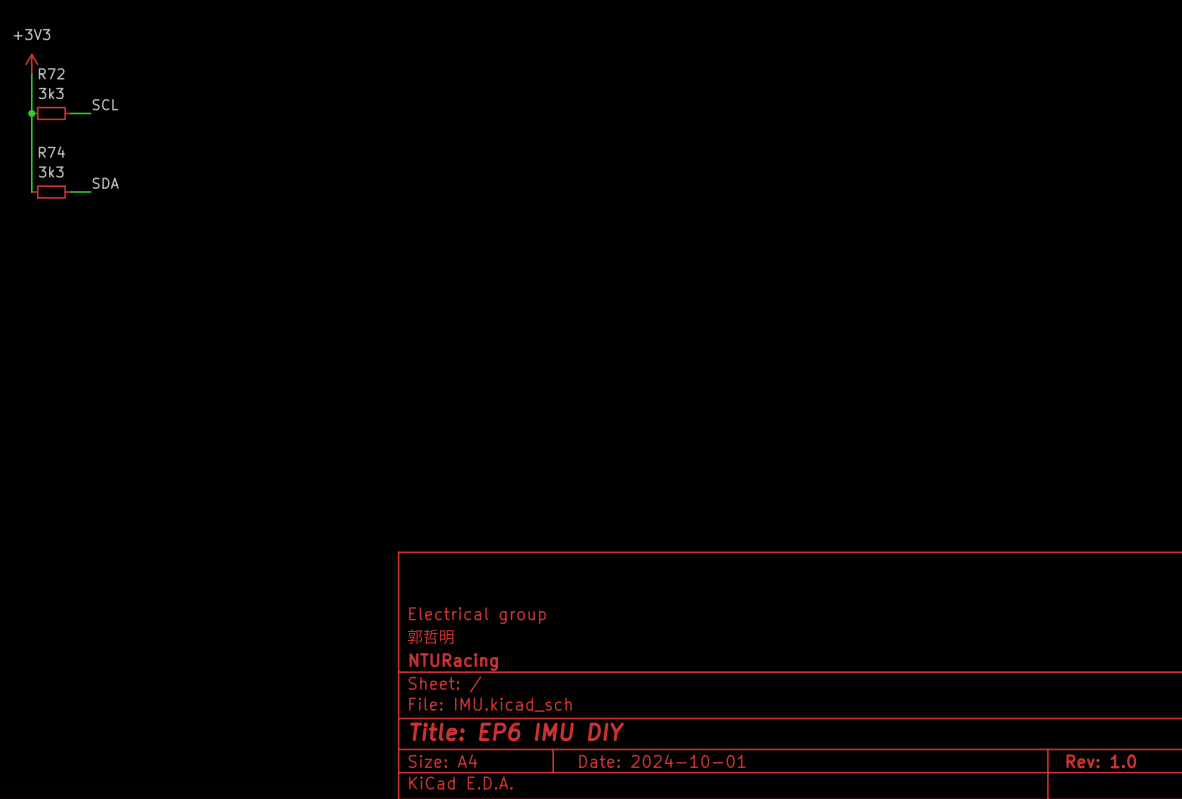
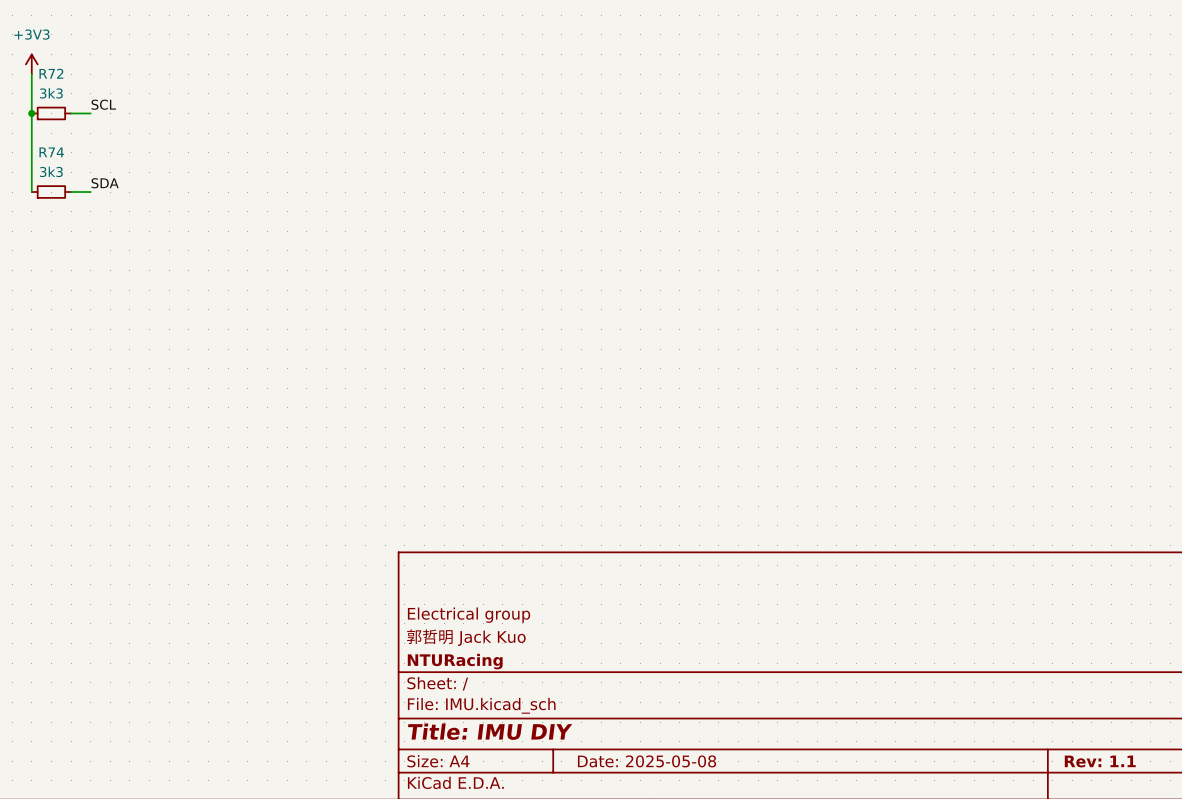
title block: 郭哲明 (430, 636) -> 郭哲明 Jack Kuo (466, 637)
title block: Title: EP6 IMU DIY (517, 731) -> Title: IMU DIY (490, 731)
title block: Date: 2024-10-01 (662, 761) -> Date: 2025-05-08 (647, 761)
title block: Rev: 1.0 (1101, 761) -> Rev: 1.1 (1100, 761)

